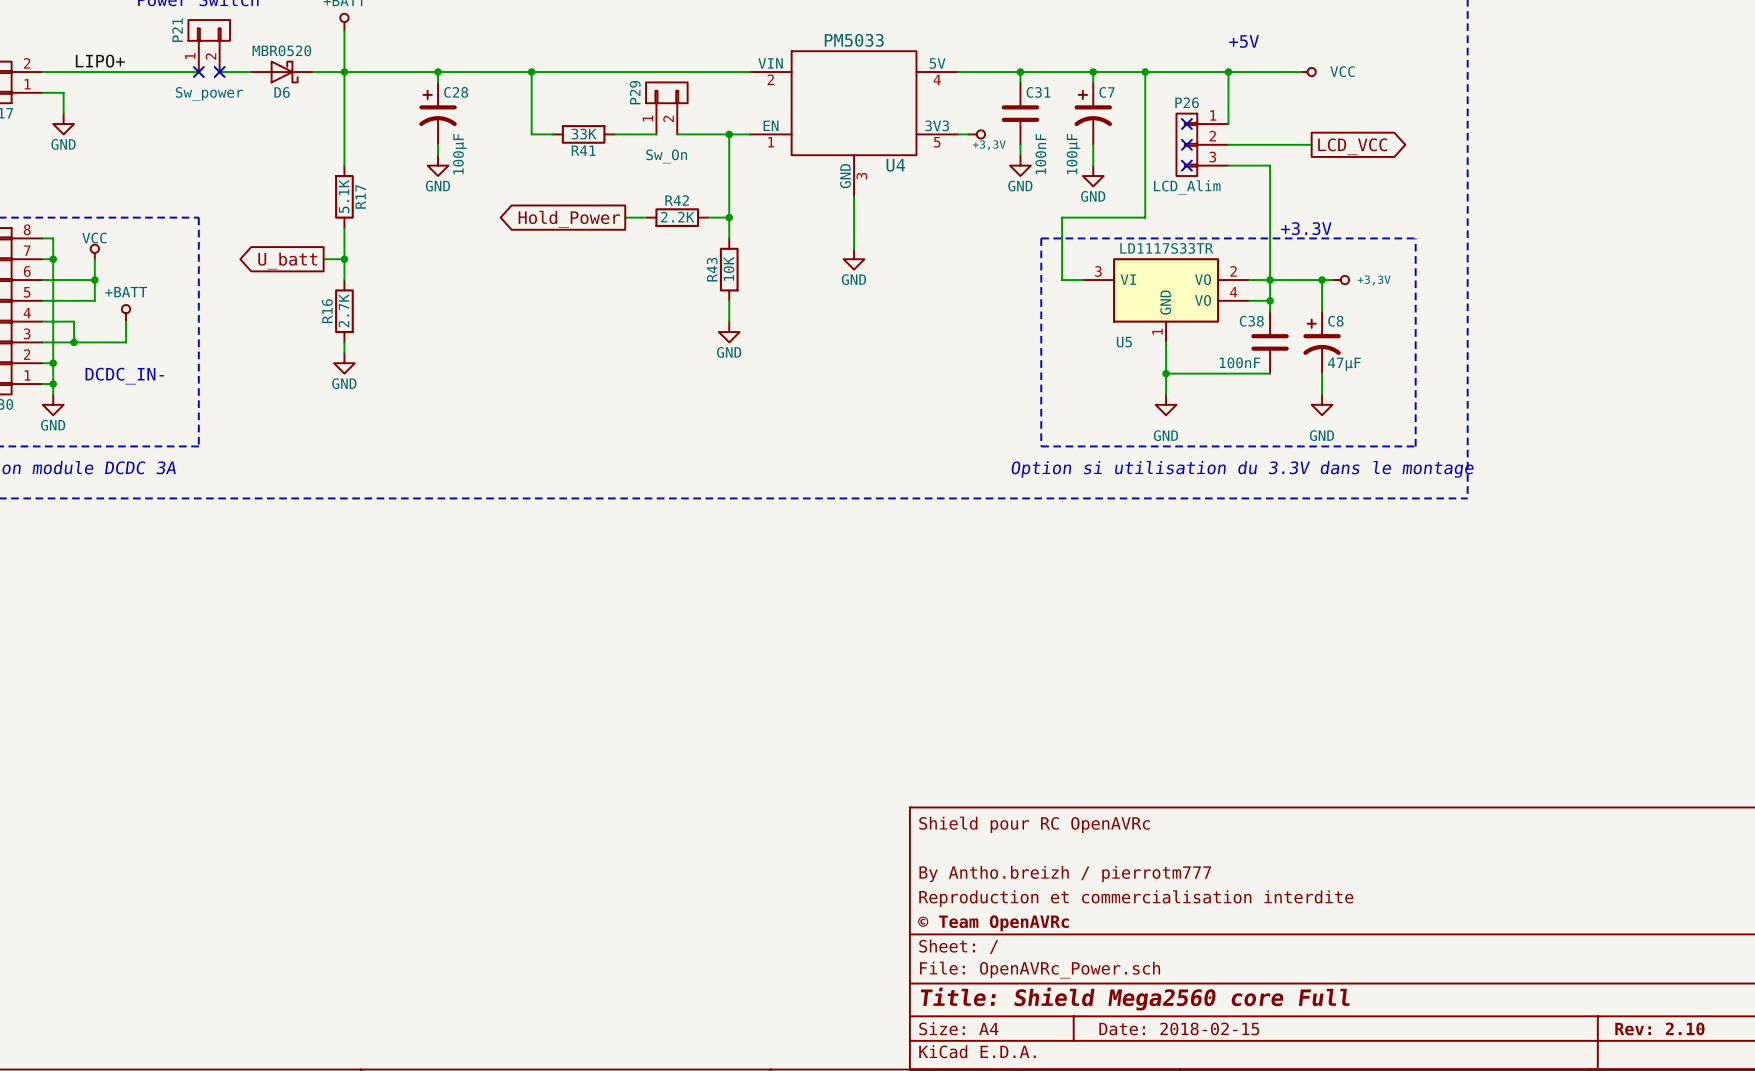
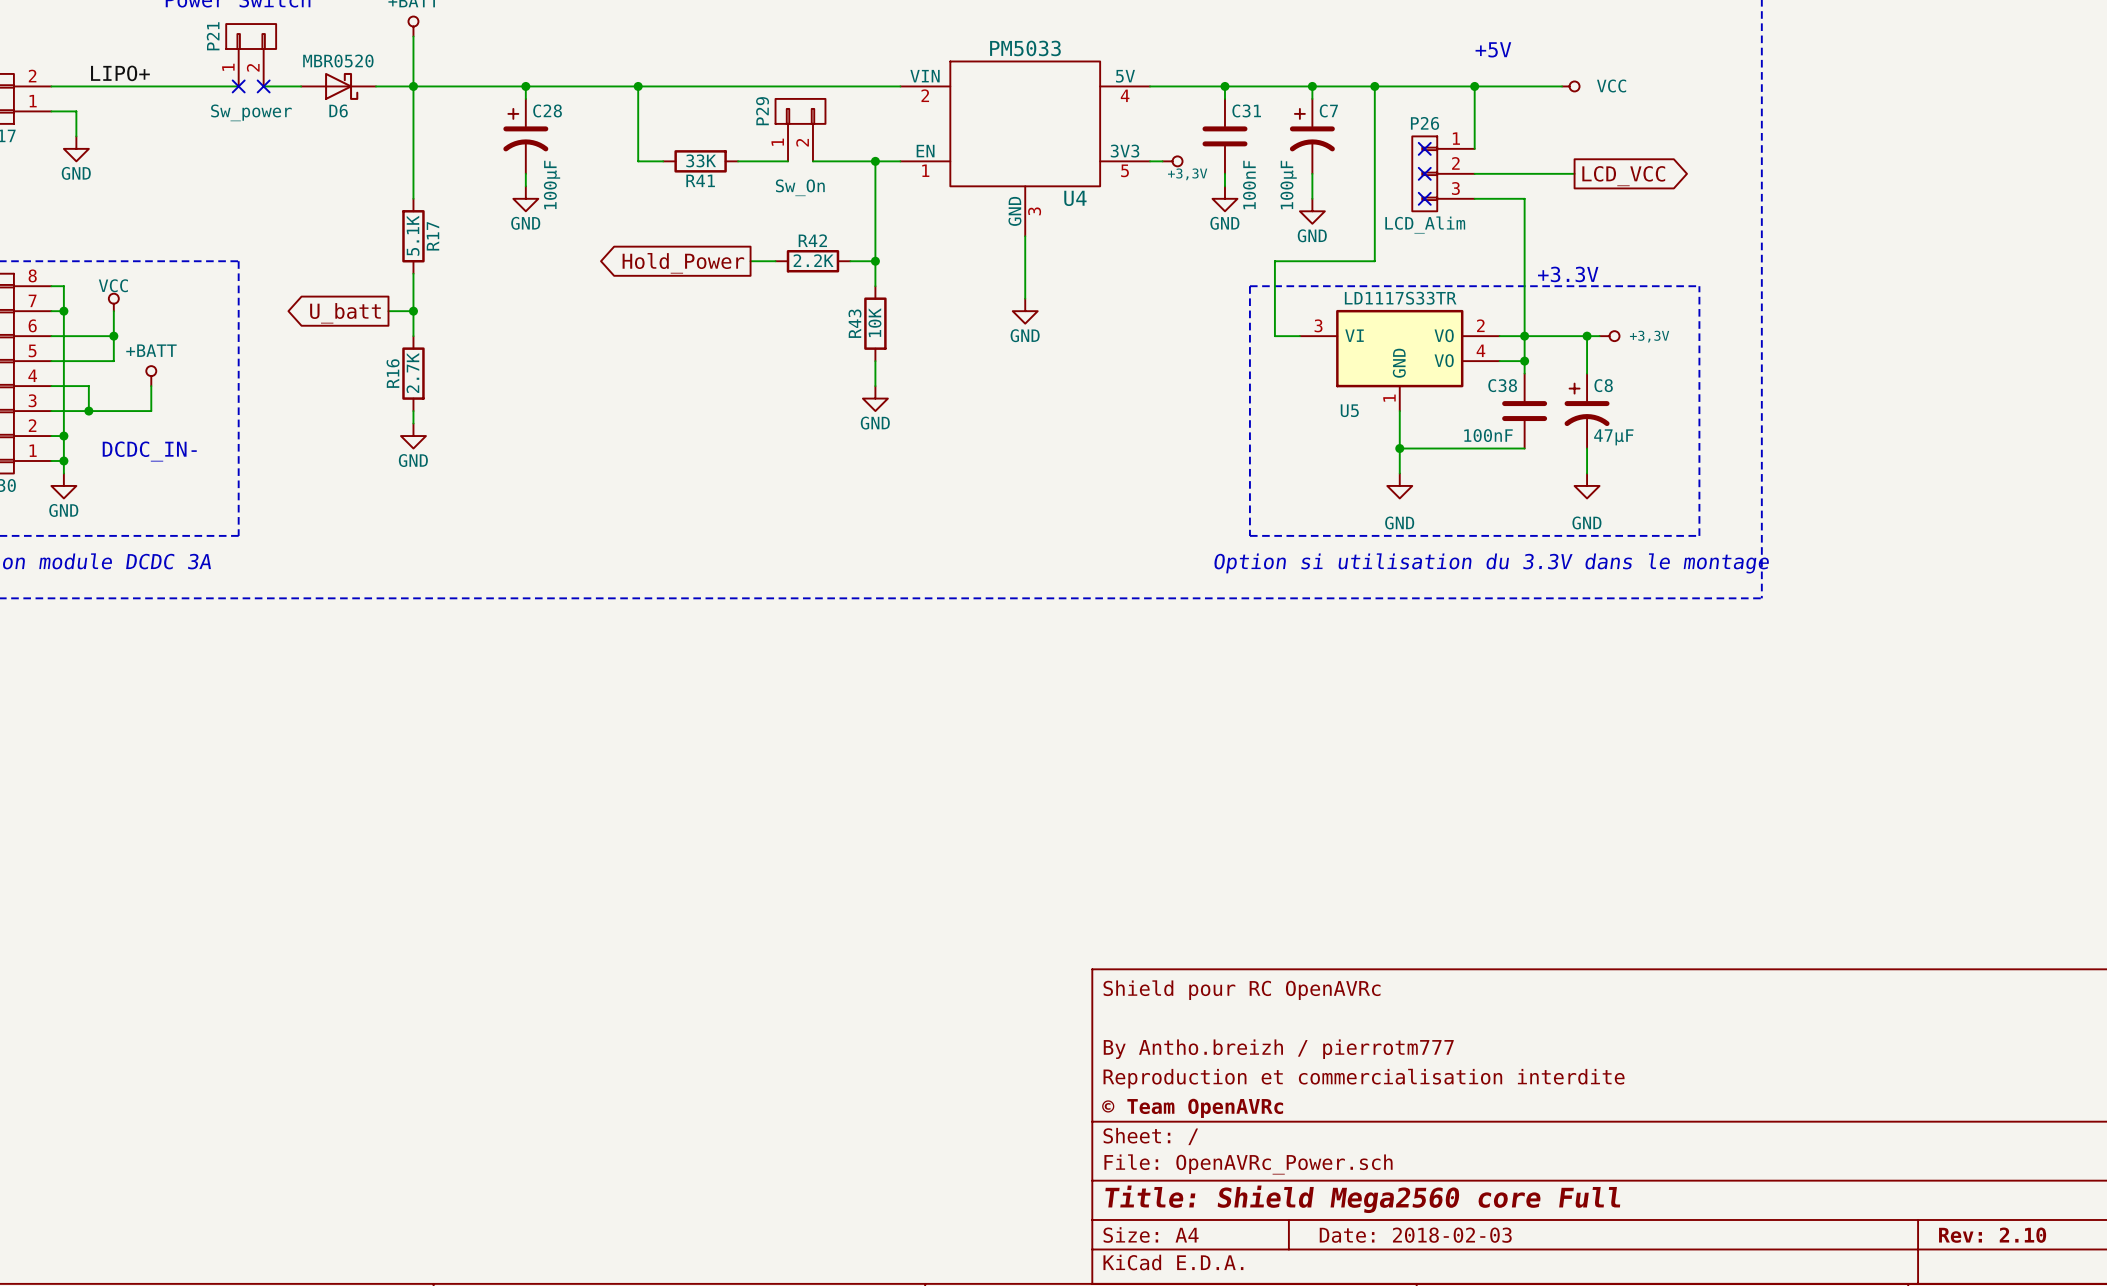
title block: Date: 2018-02-15 (1179, 1028) -> Date: 2018-02-03 (1415, 1235)

